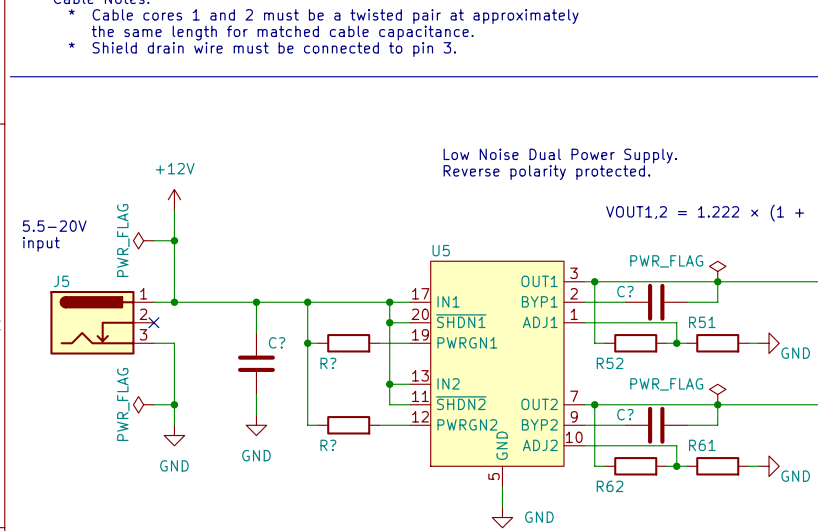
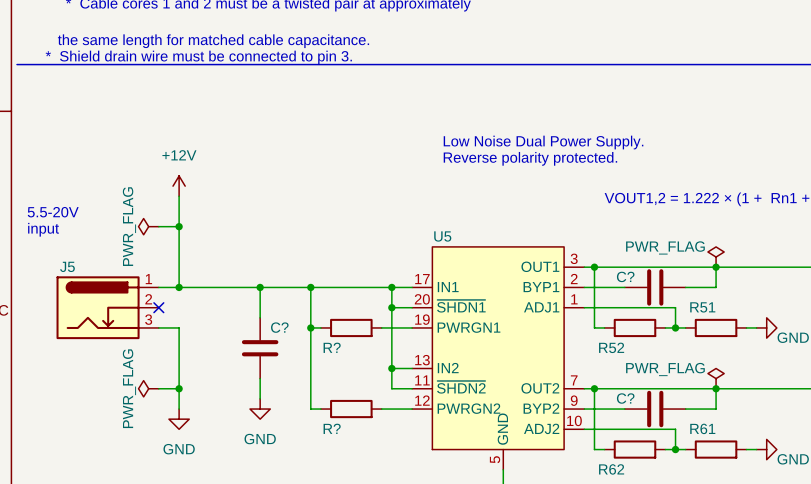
text position: the same length for matched cable capacitance. (282, 33) -> the same length for matched cable capacitance. (213, 41)
text position: * Shield drain wire must be connected to pin 3. (262, 49) -> * Shield drain wire must be connected to pin 3. (198, 57)

